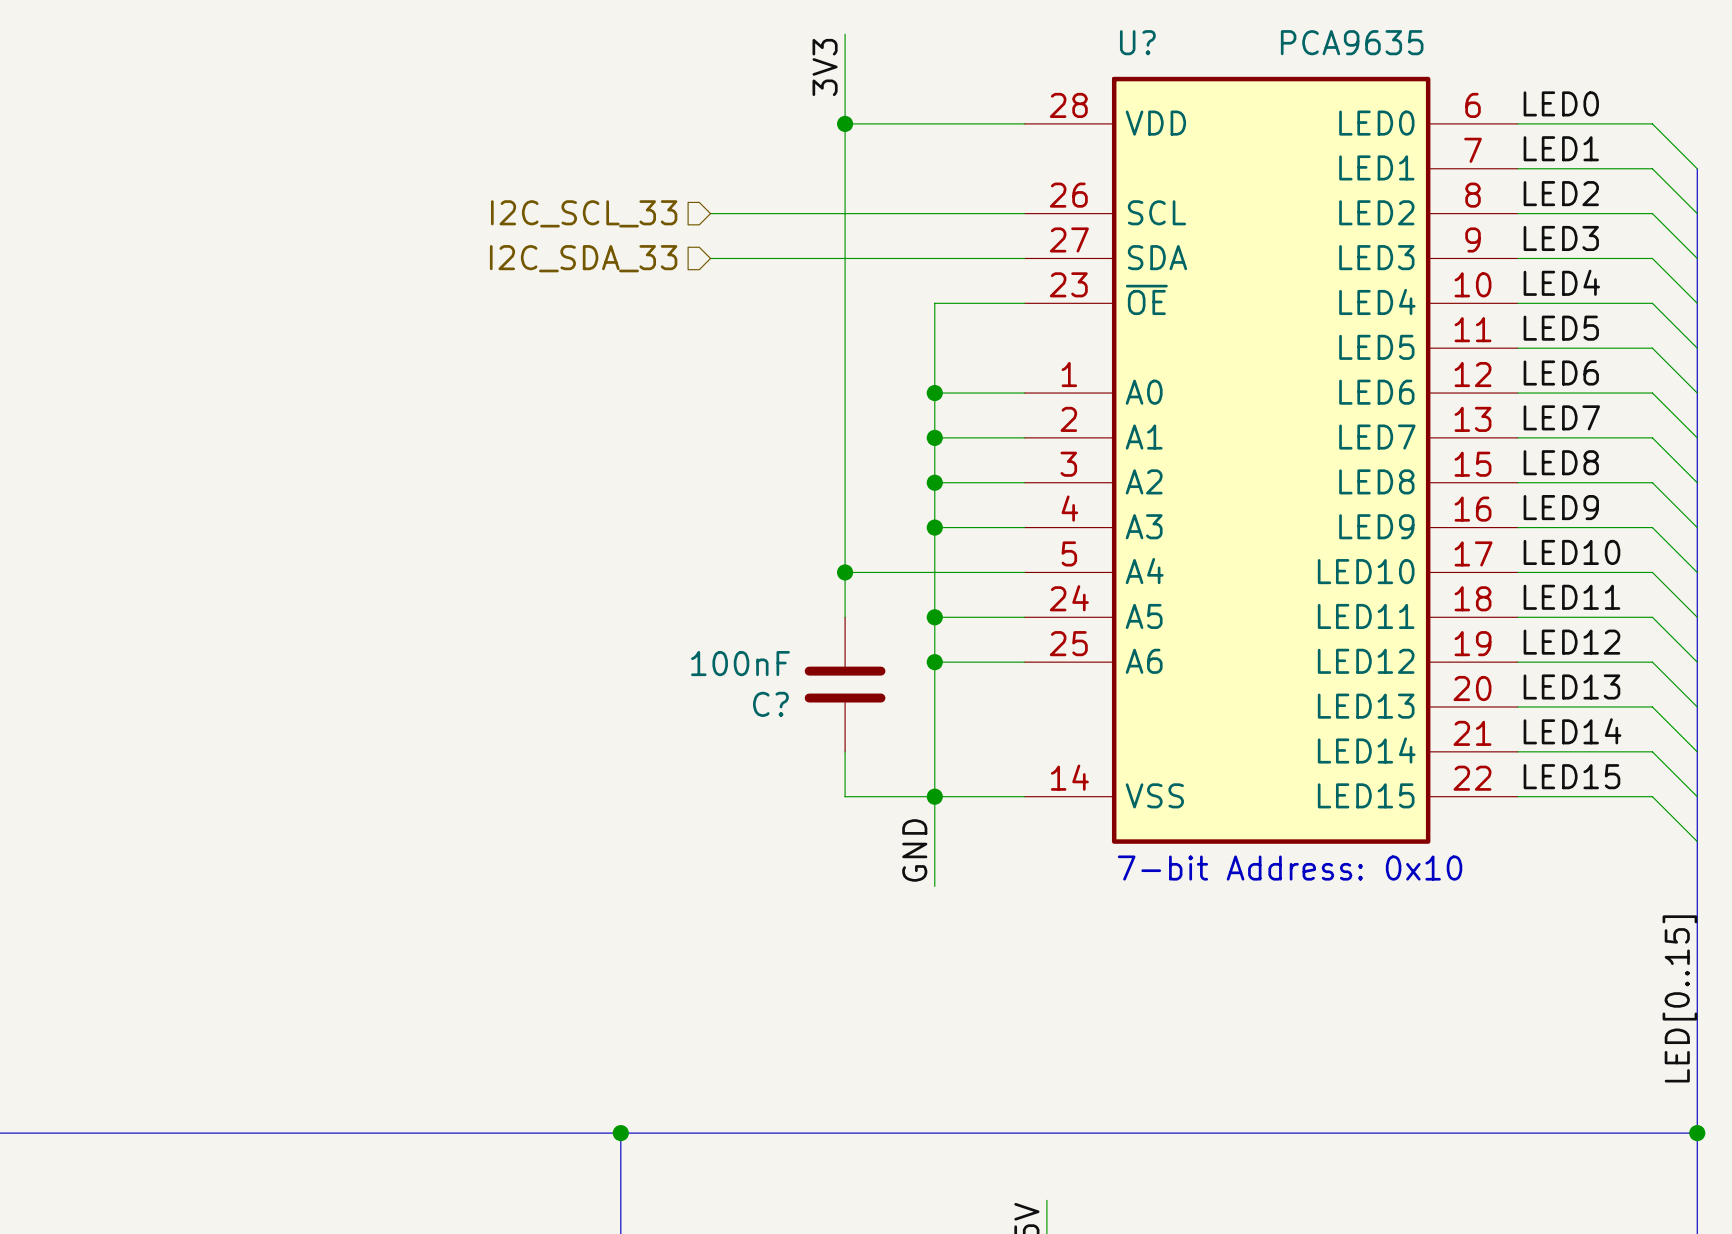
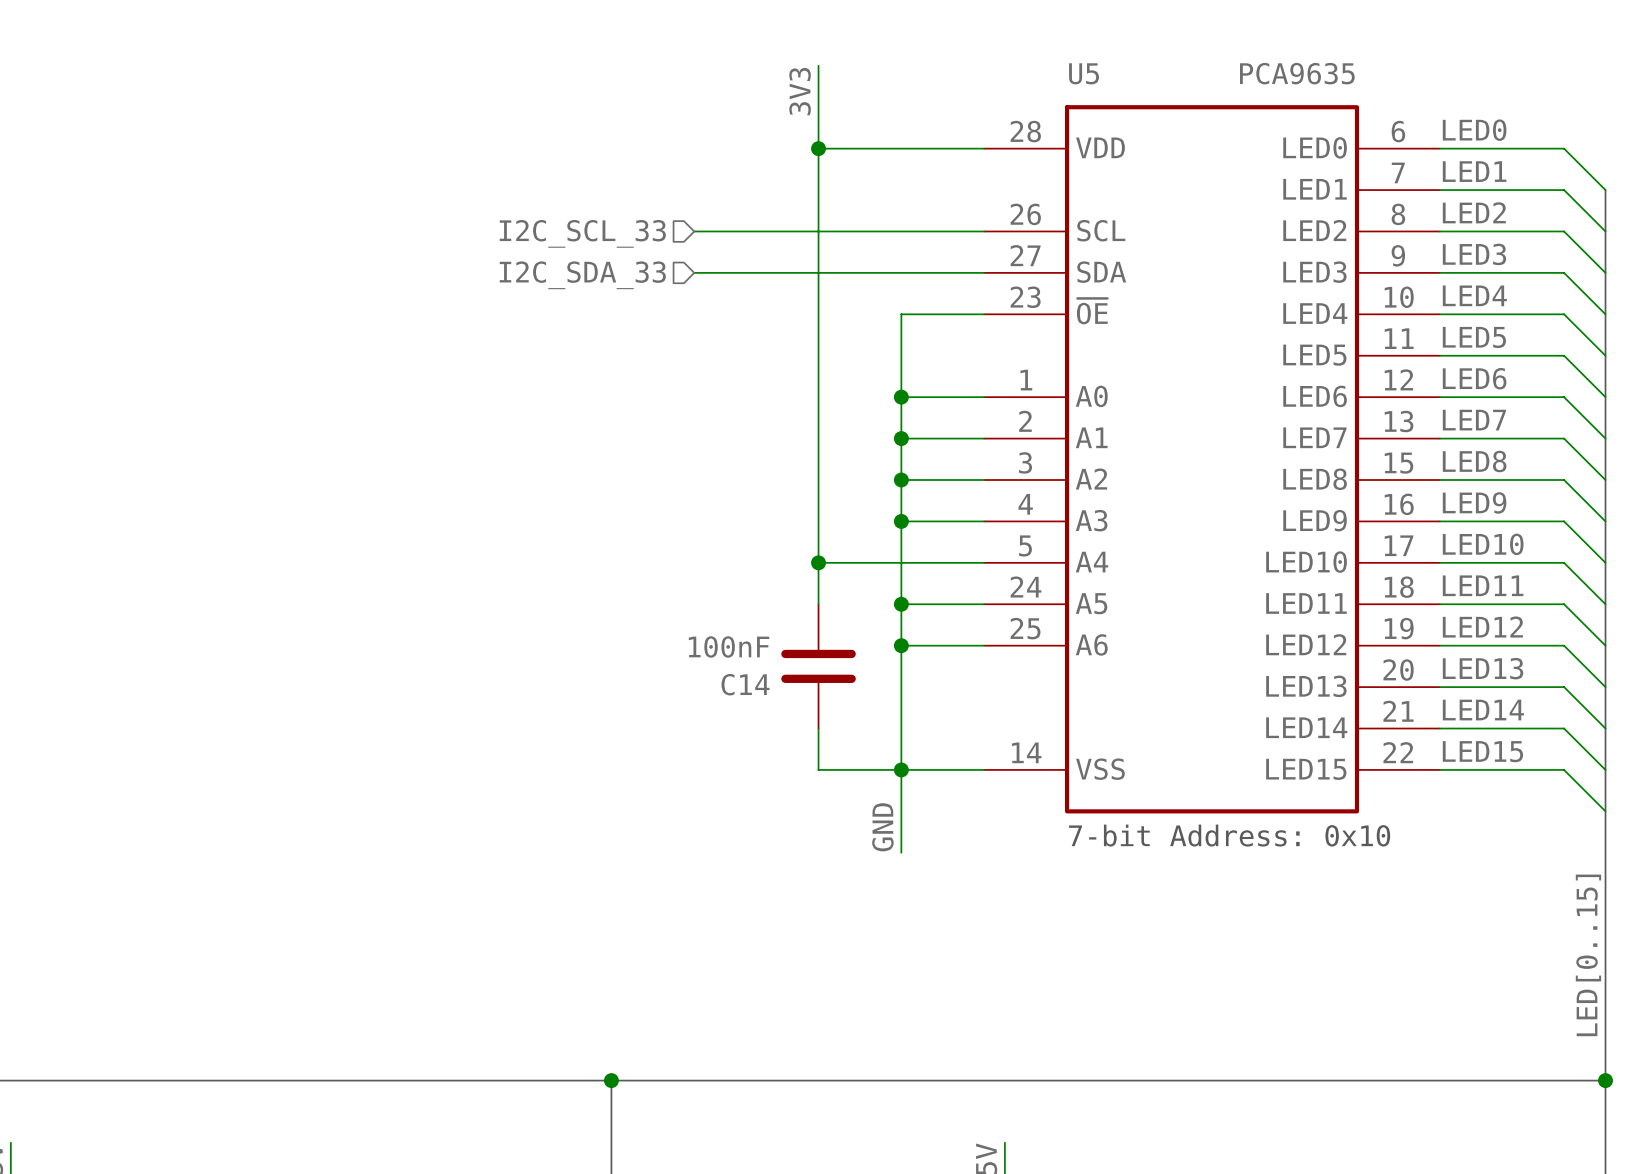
U? name: U? (1137, 42) -> U5 (1084, 73)
C? name: C? (770, 704) -> C14 (745, 684)

